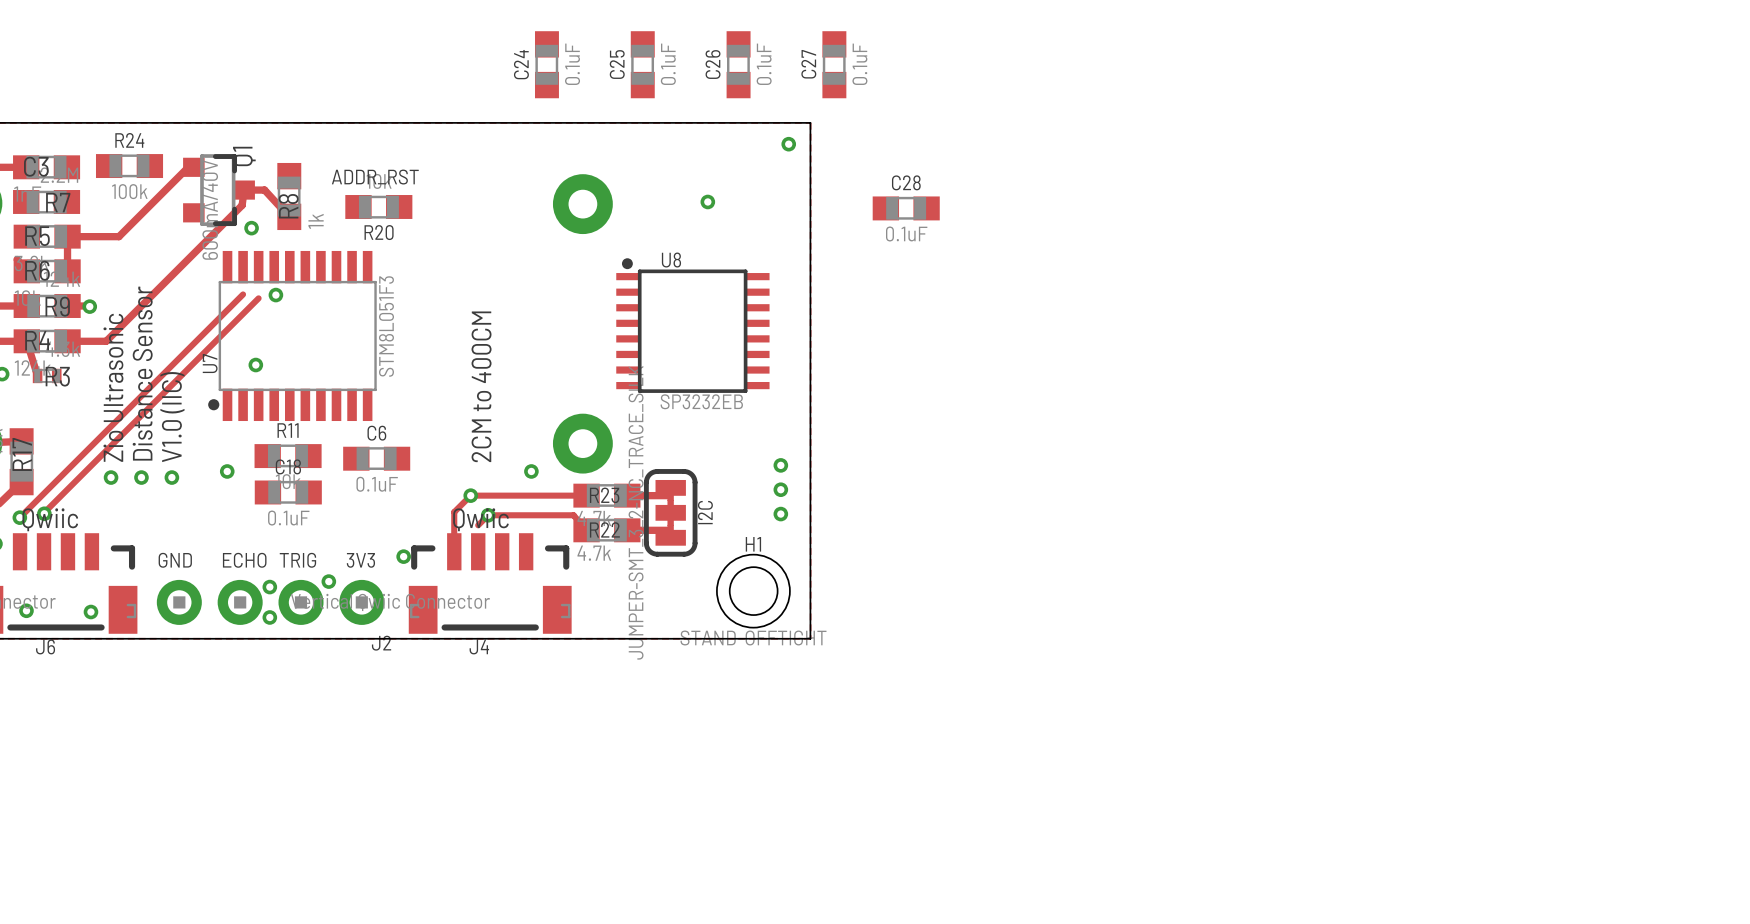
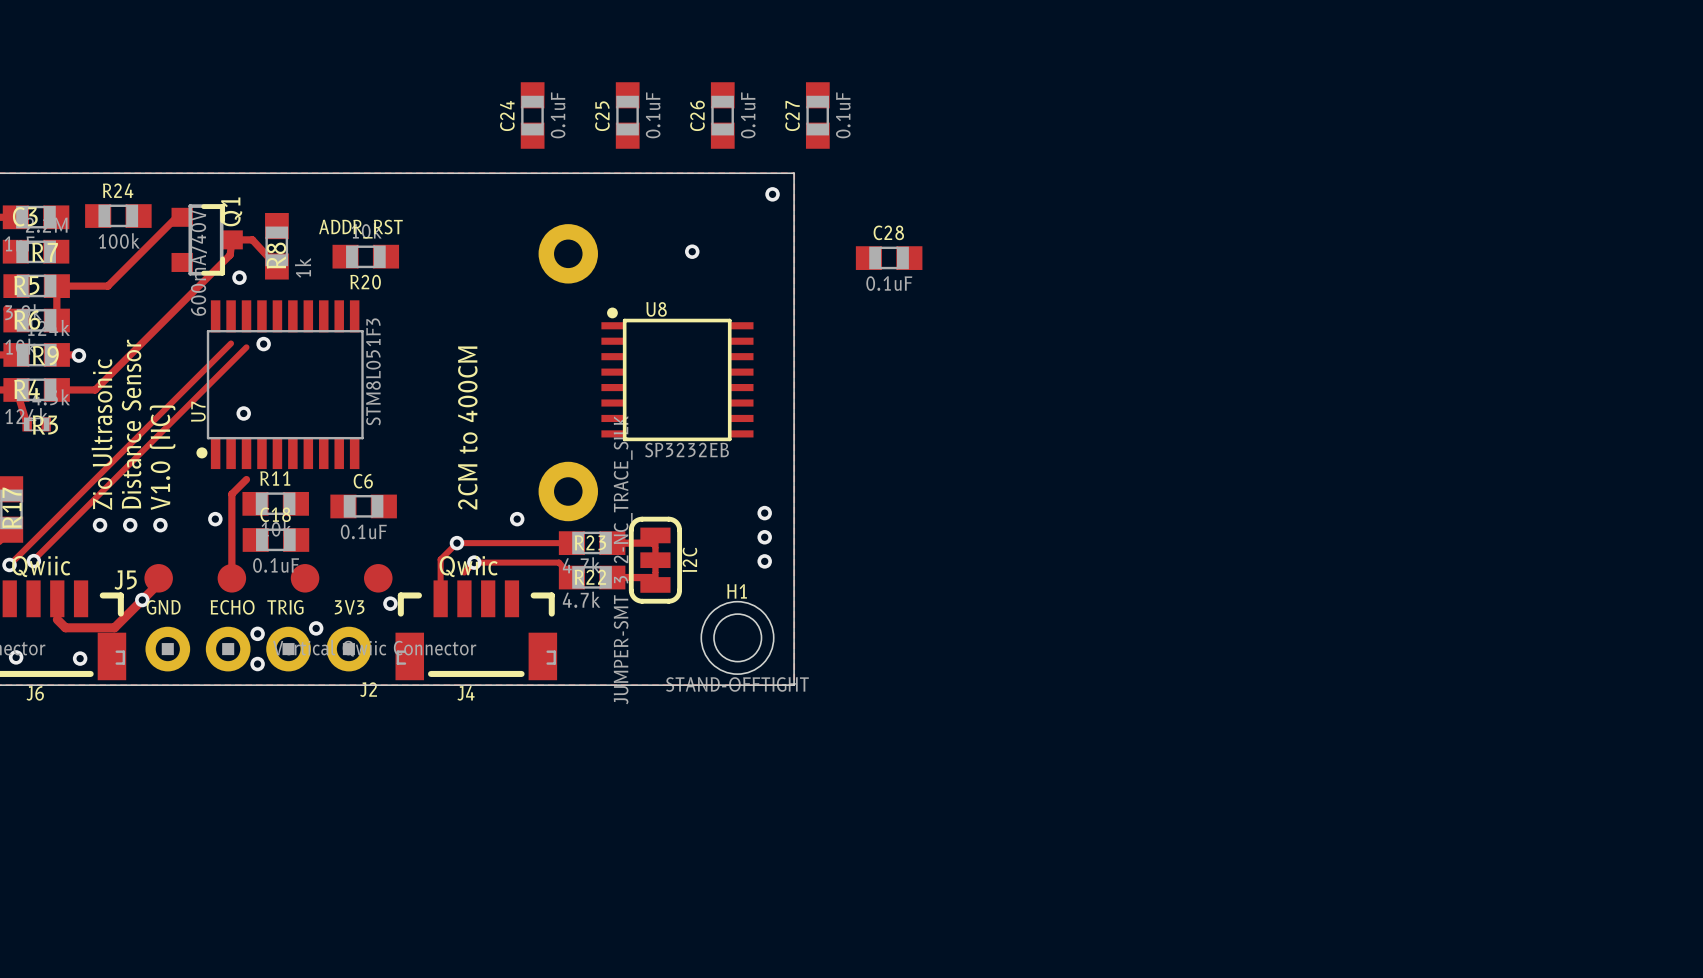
track: none -> (246, 479) (231, 494) (231, 578)
track: none -> (158, 578) (158, 583) (114, 627) (65, 627) (57, 619)
J5: none -> (268, 578)
via: none -> (142, 600)

